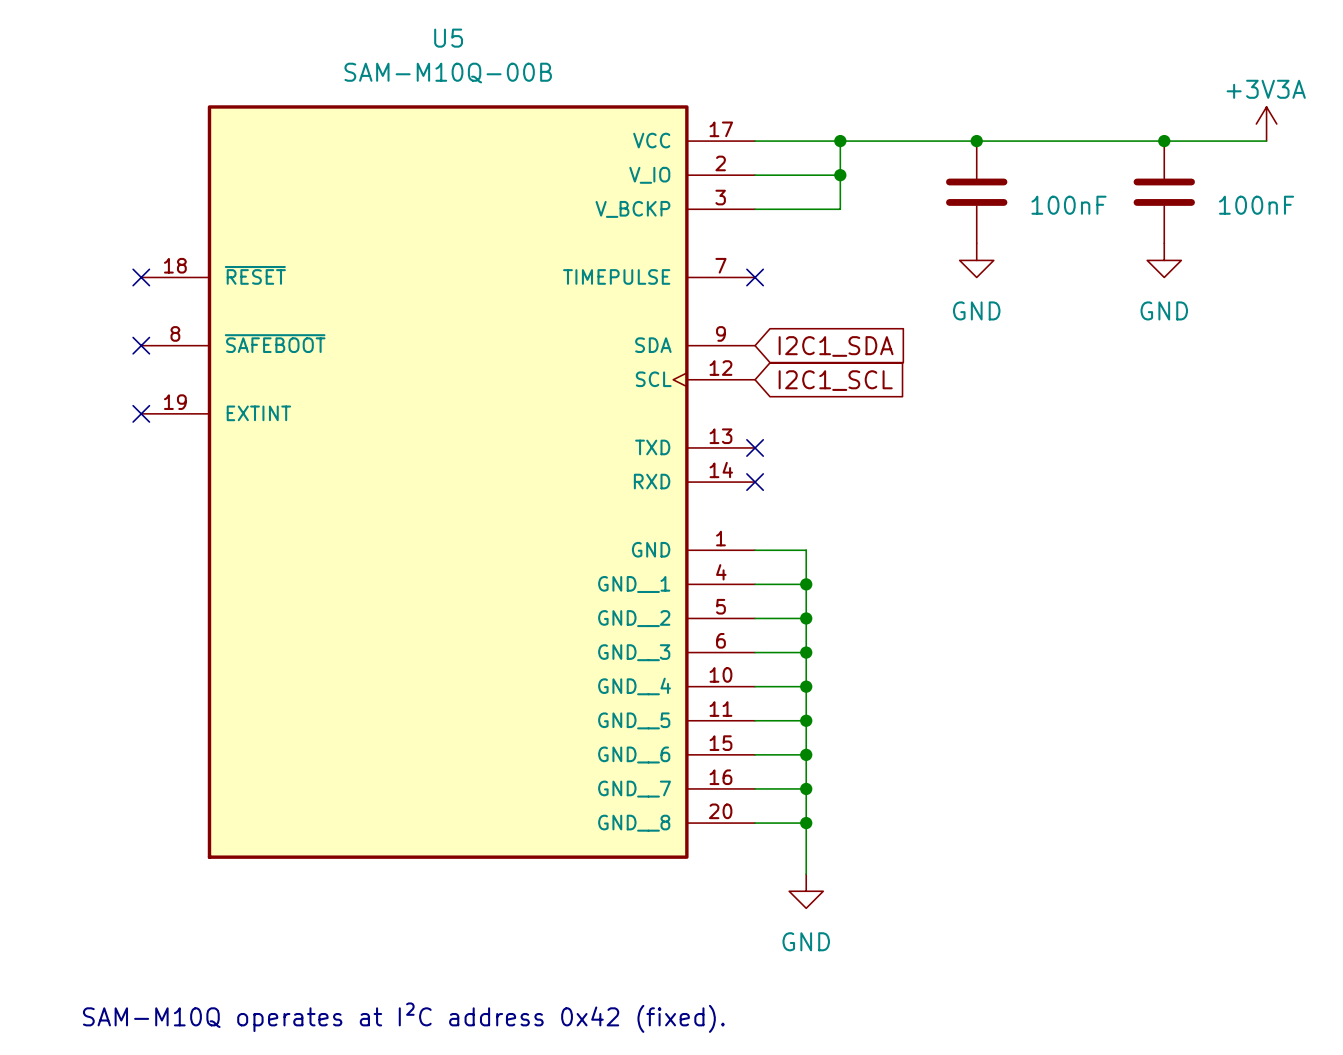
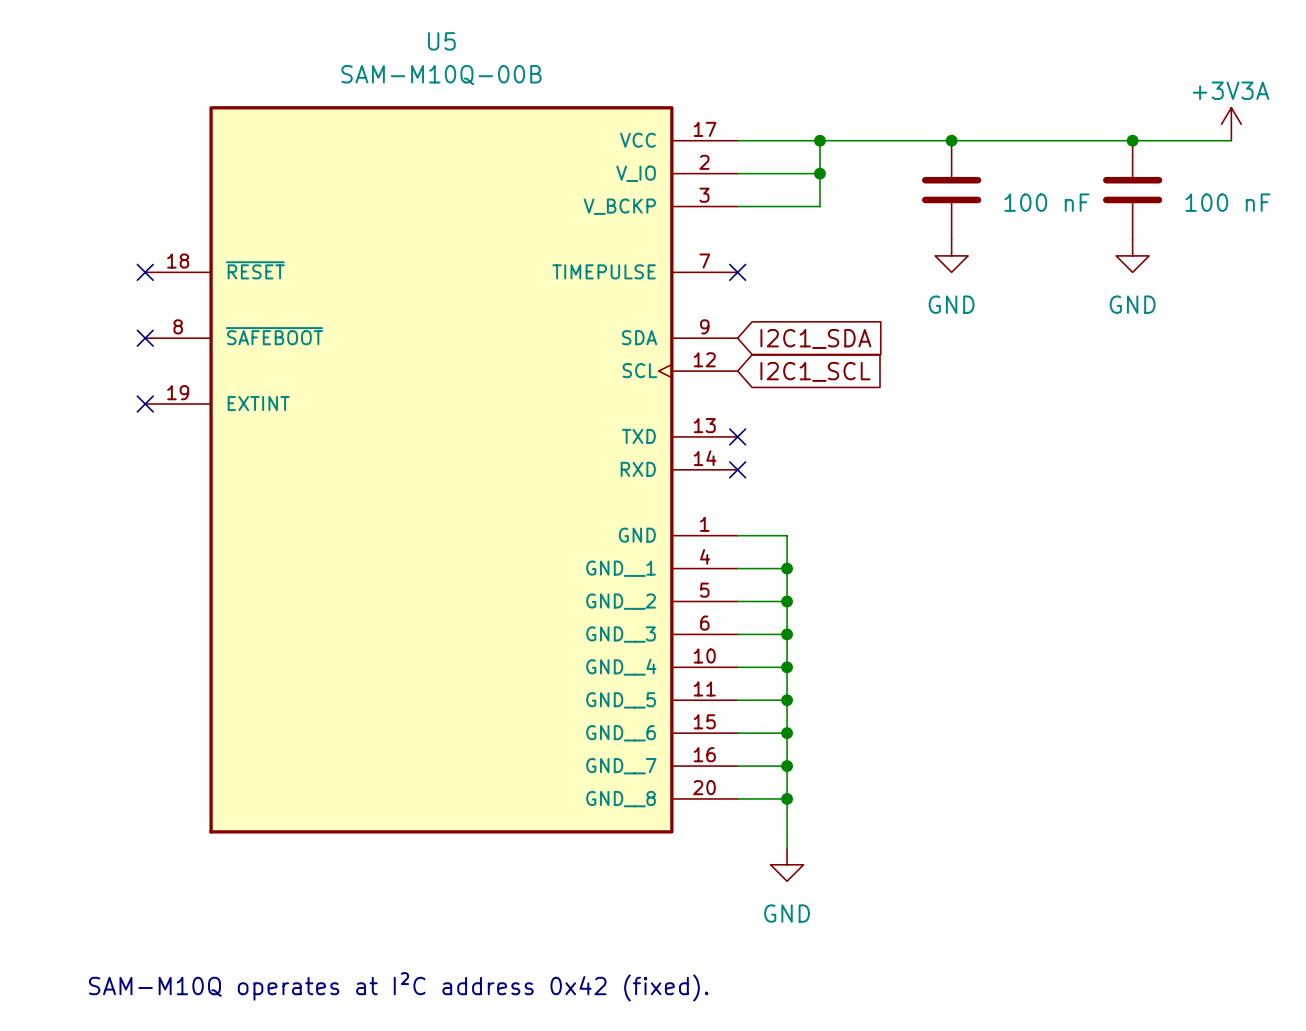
part value: 100nF (1068, 205) -> 100 nF (1046, 202)
part value: 100nF (1256, 205) -> 100 nF (1227, 202)

